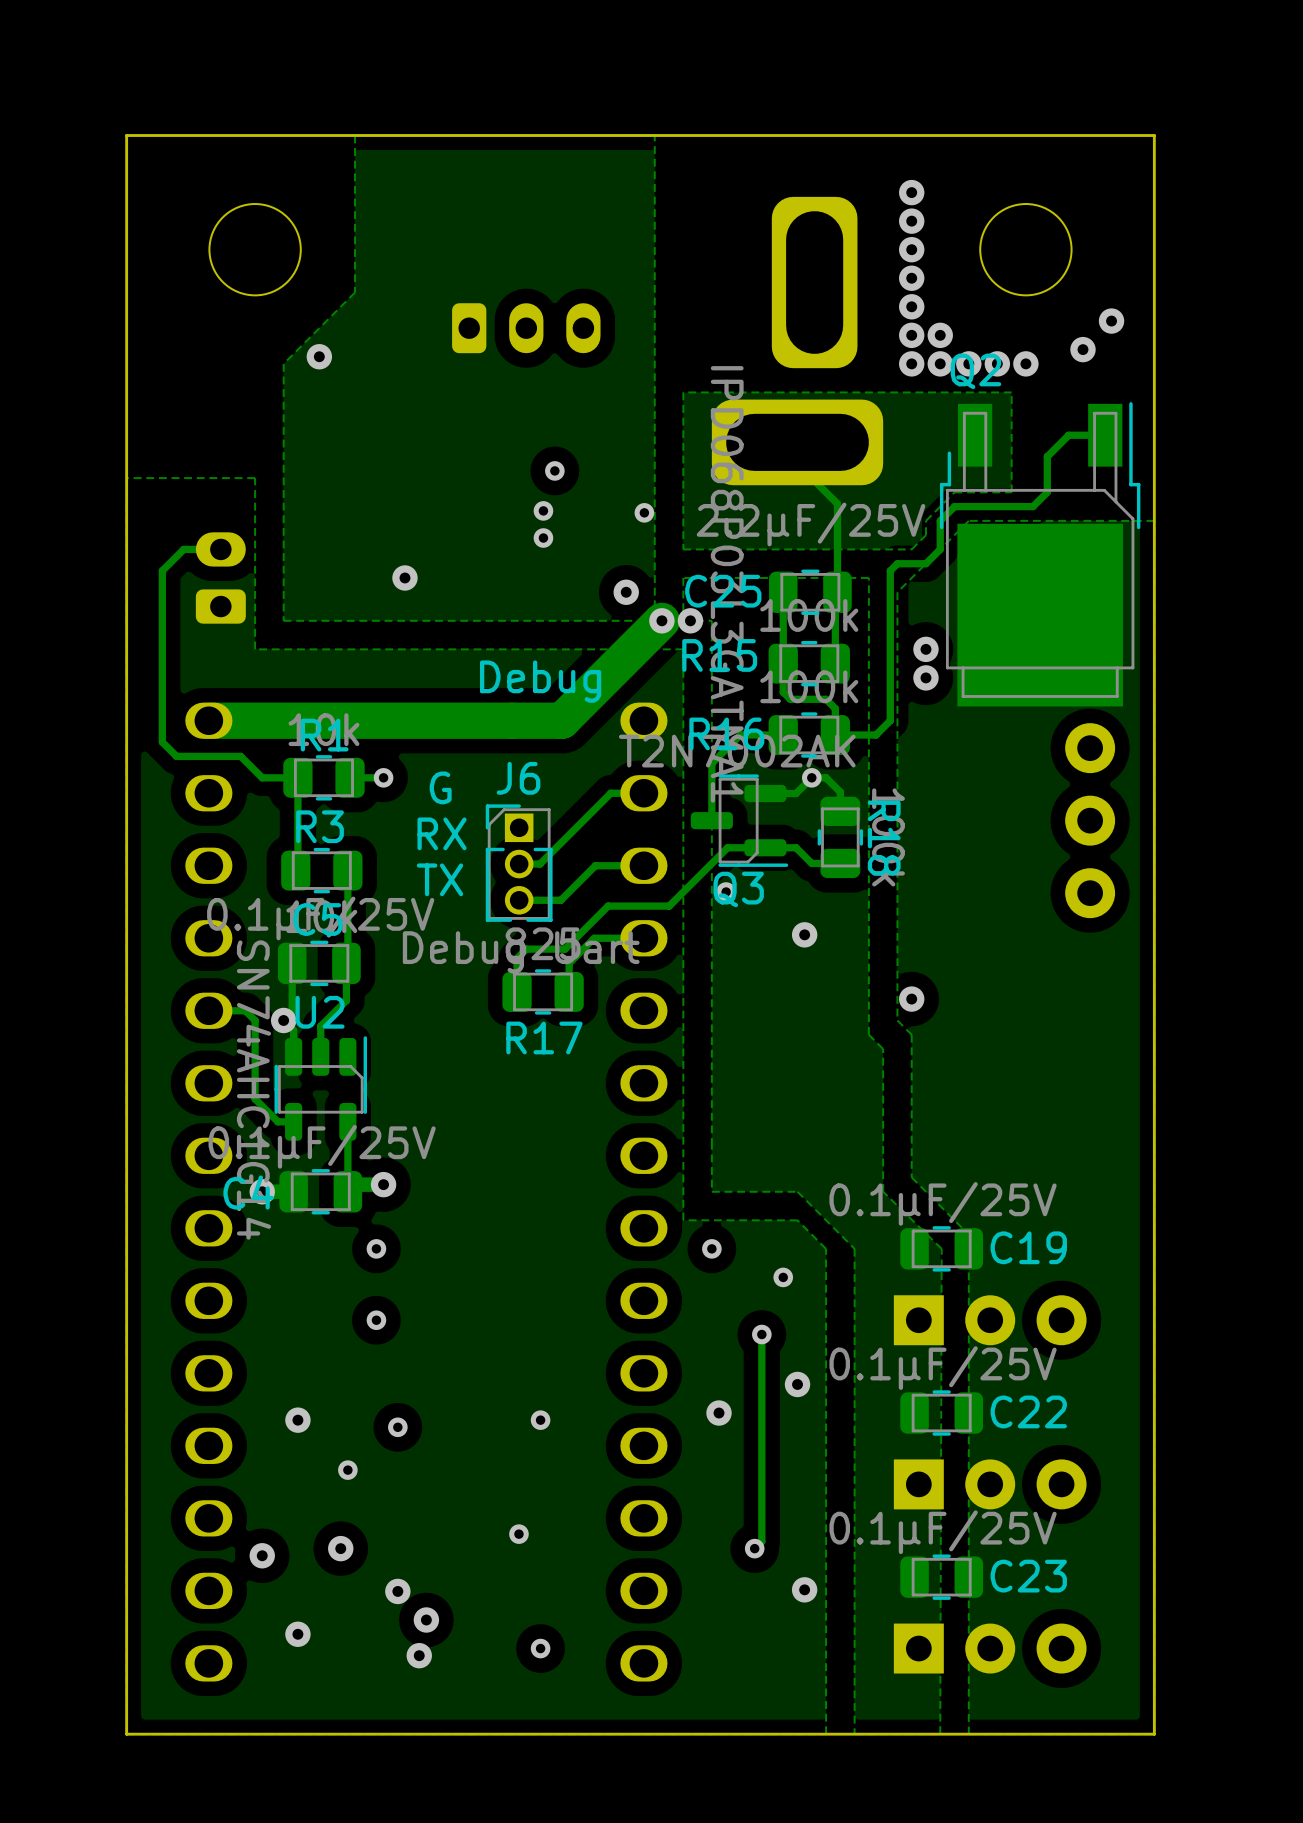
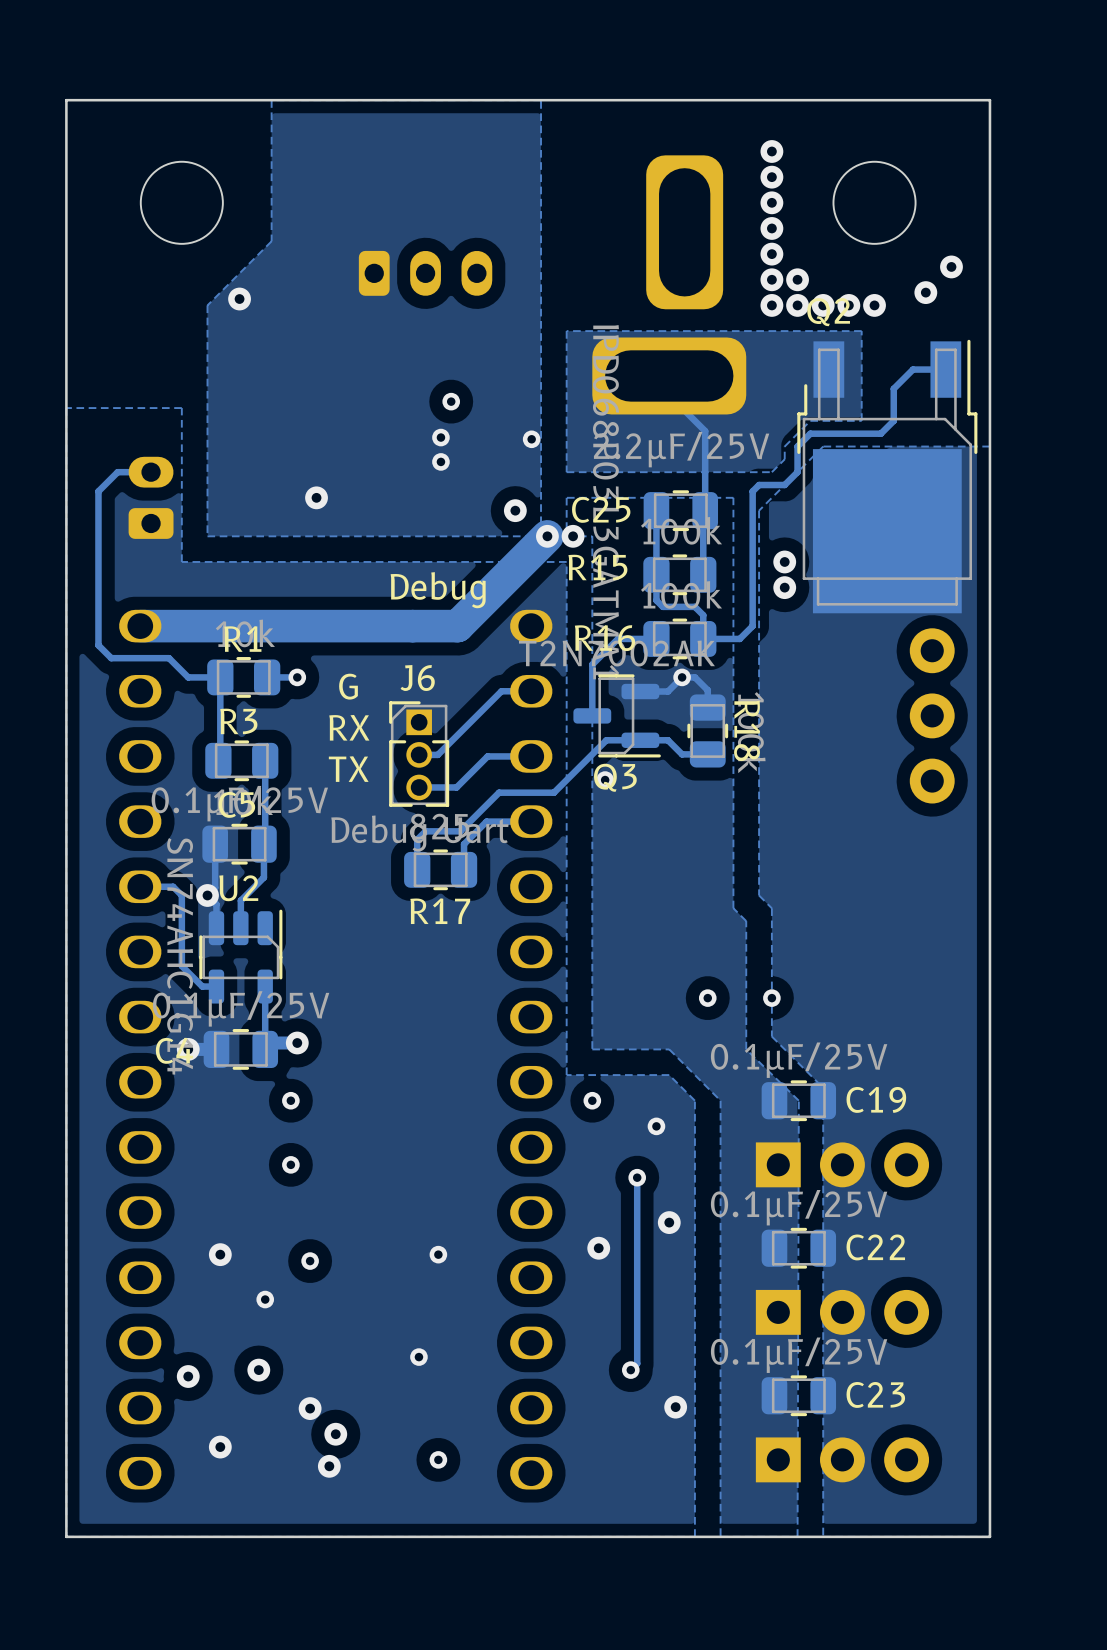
via: (804, 934) -> none
via: (911, 999) -> none
via: none -> (707, 998)
via: none -> (771, 998)

